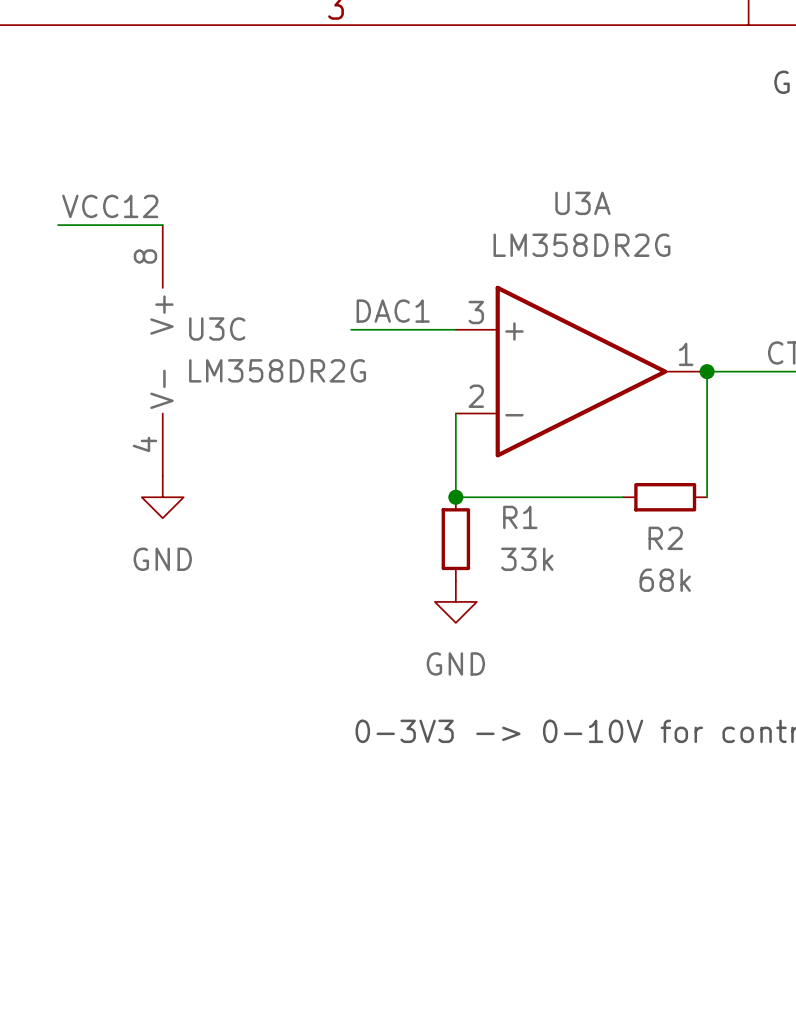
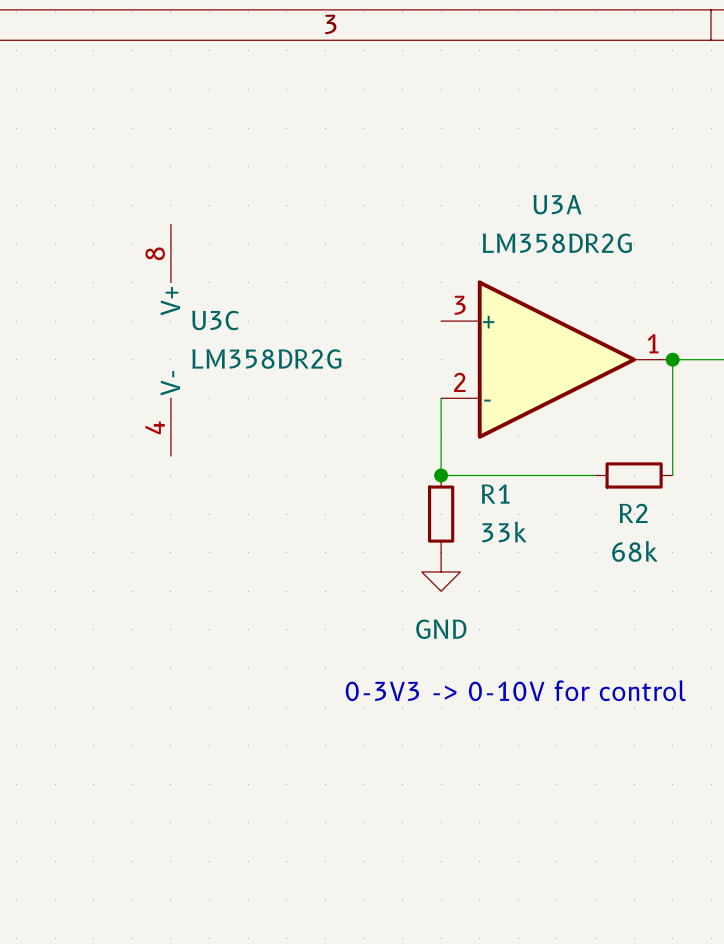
label: VCC12 (110, 206) -> none
wire: (58, 225) (162, 225) -> none
label: DAC1 (393, 311) -> none
wire: (351, 329) (455, 329) -> none
power symbol: GND (162, 497) -> none

